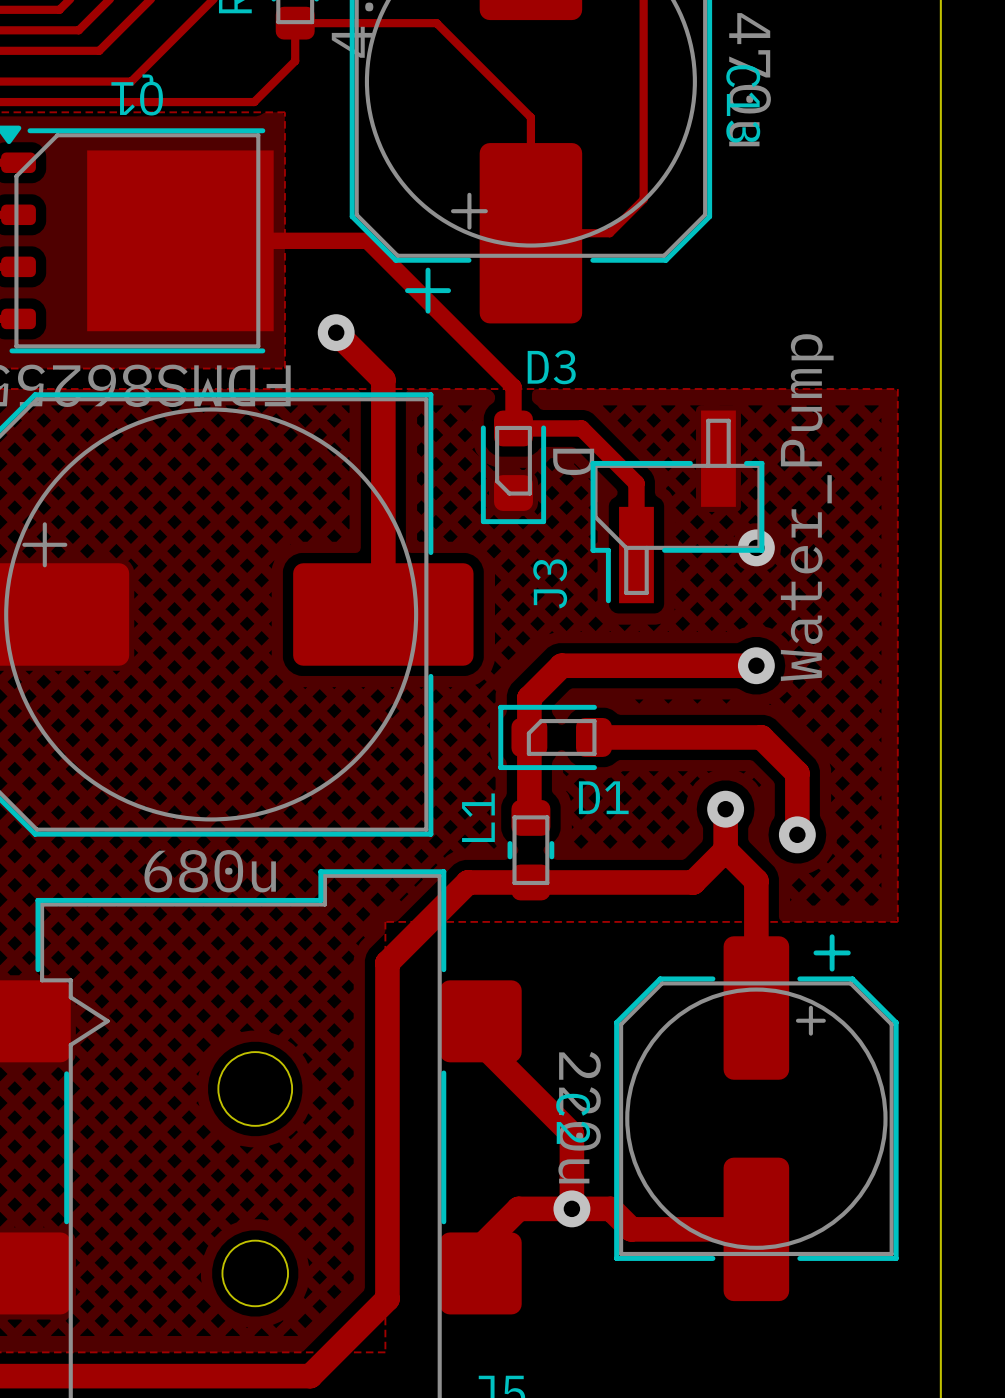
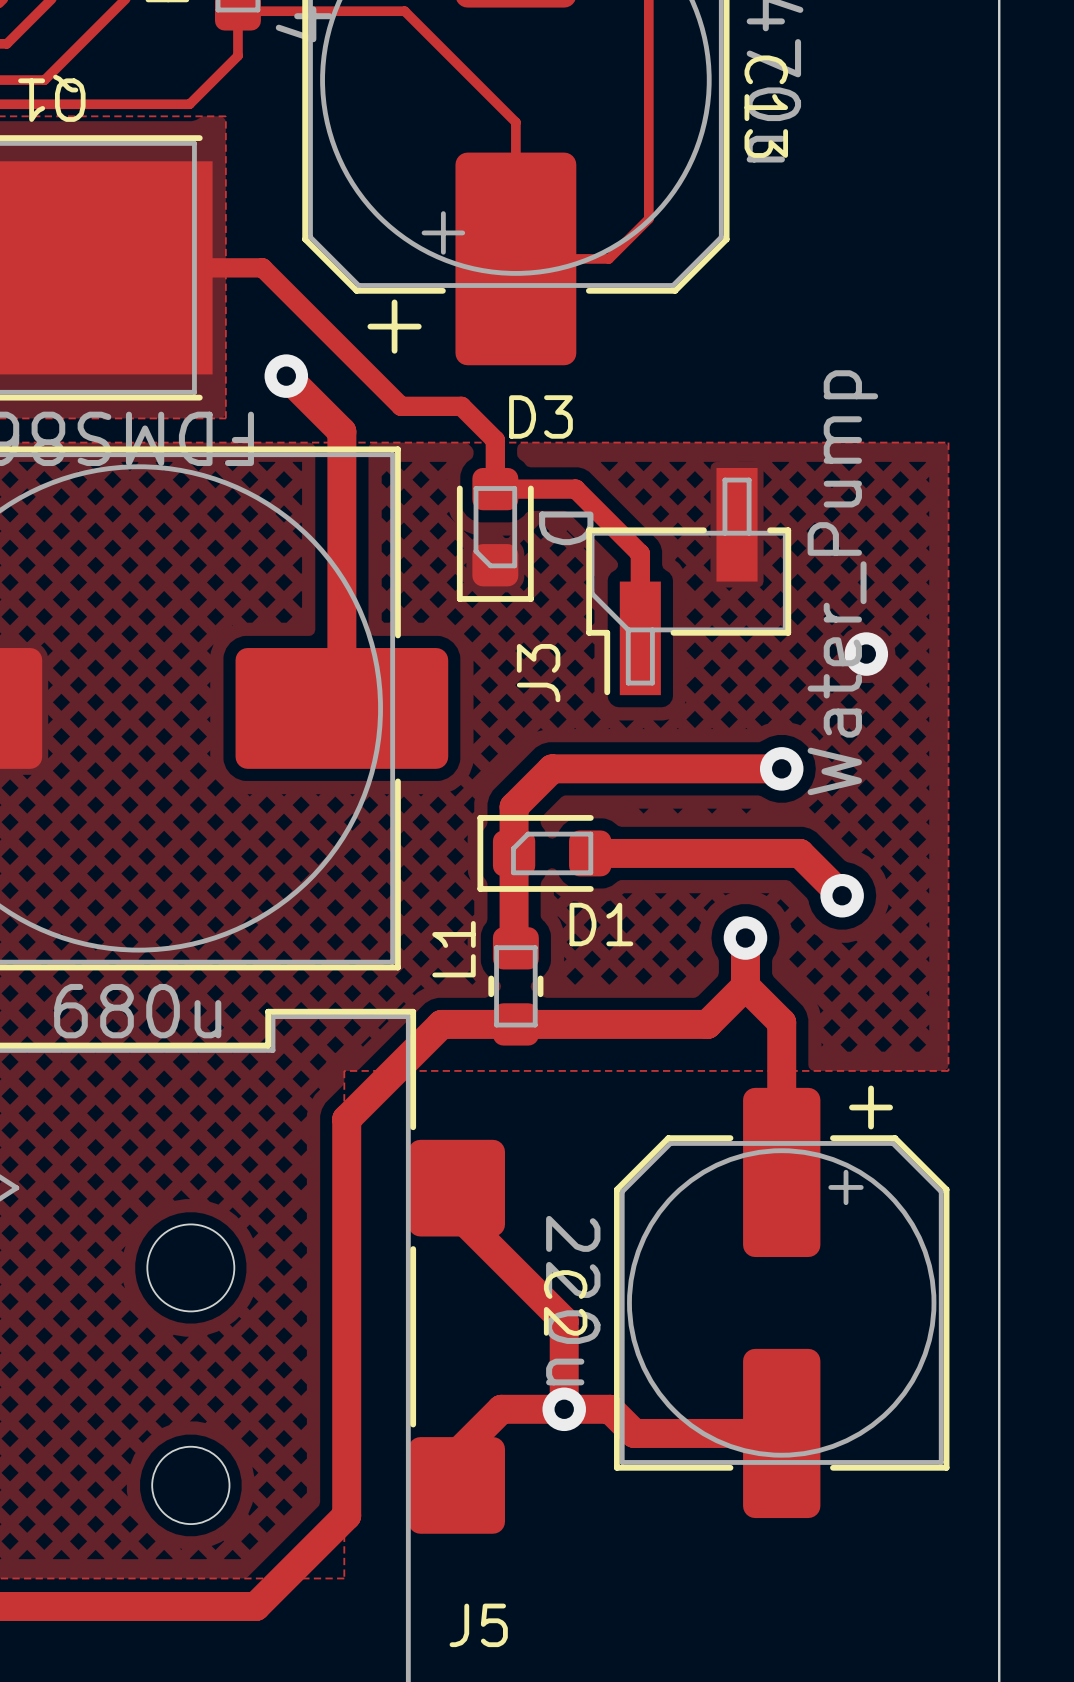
track: (316, 240) (367, 240) (484, 358) -> (262, 267) (401, 406) (461, 406)
via position: (756, 547) -> (866, 654)
track: (761, 737) (797, 773) (797, 834) -> (787, 853) (799, 853) (842, 895)
via position: (797, 834) -> (842, 895)

